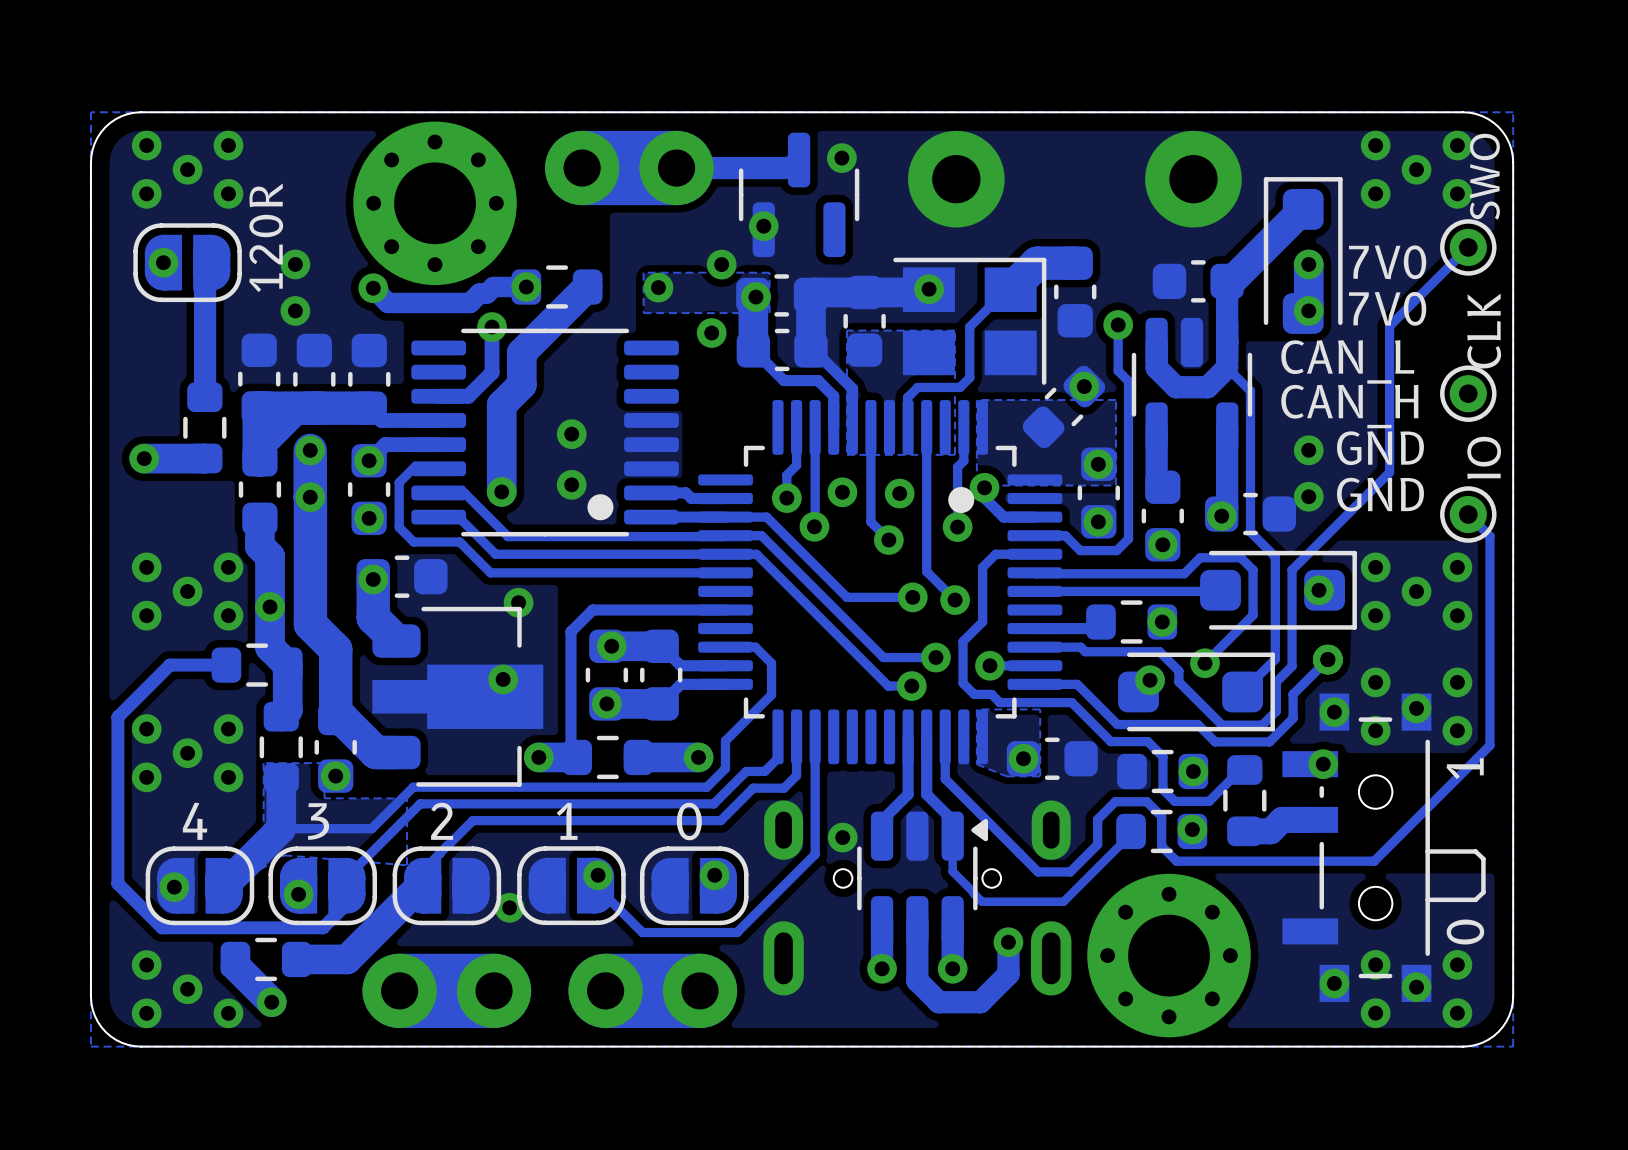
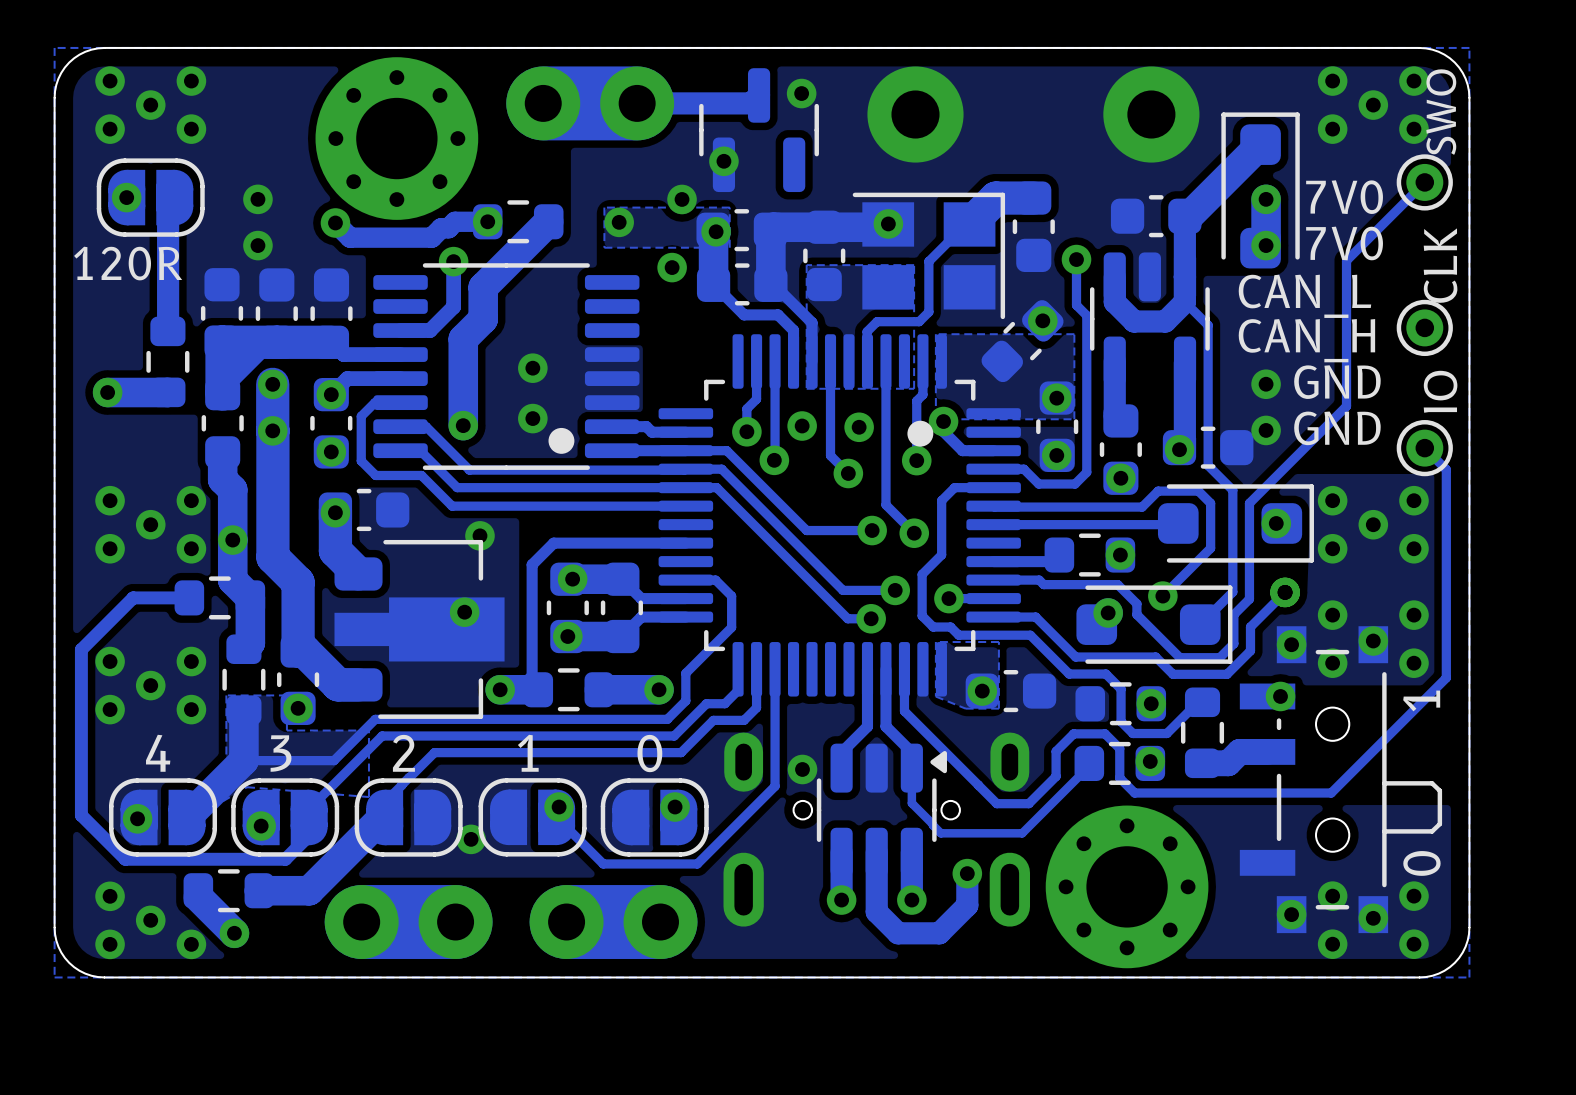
text rotation: 0° (266, 237) -> 90° clockwise (128, 263)

